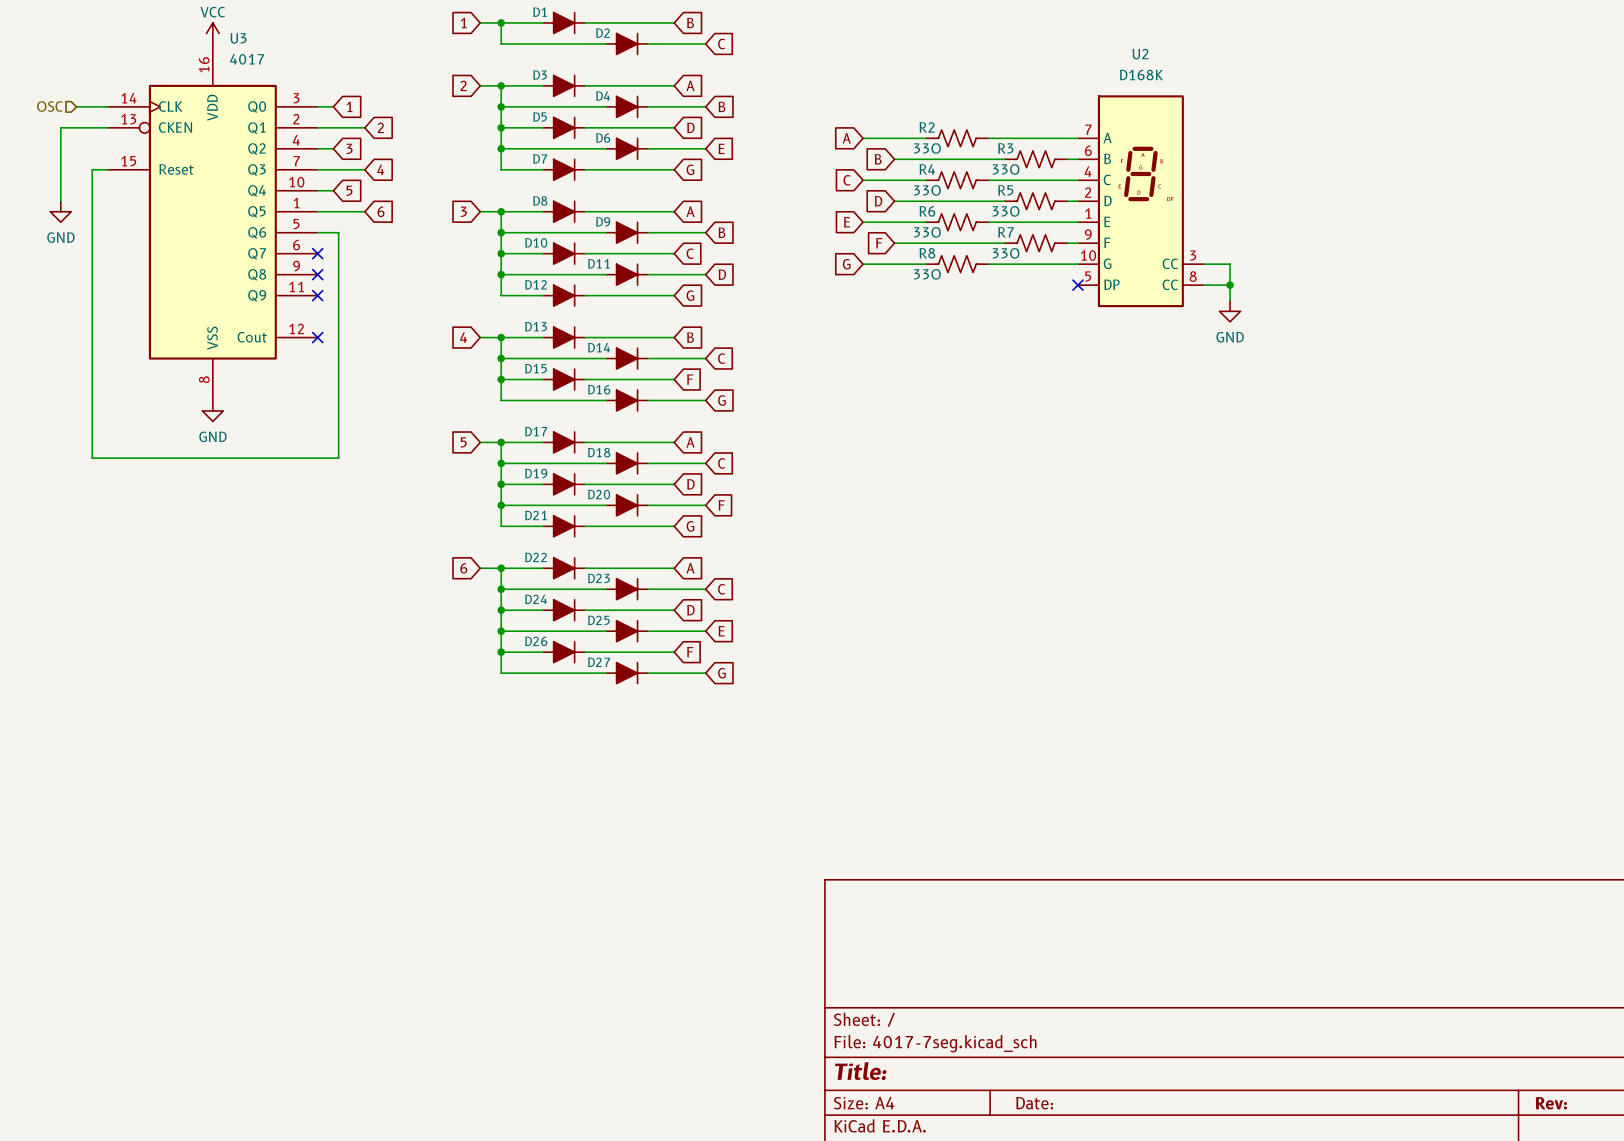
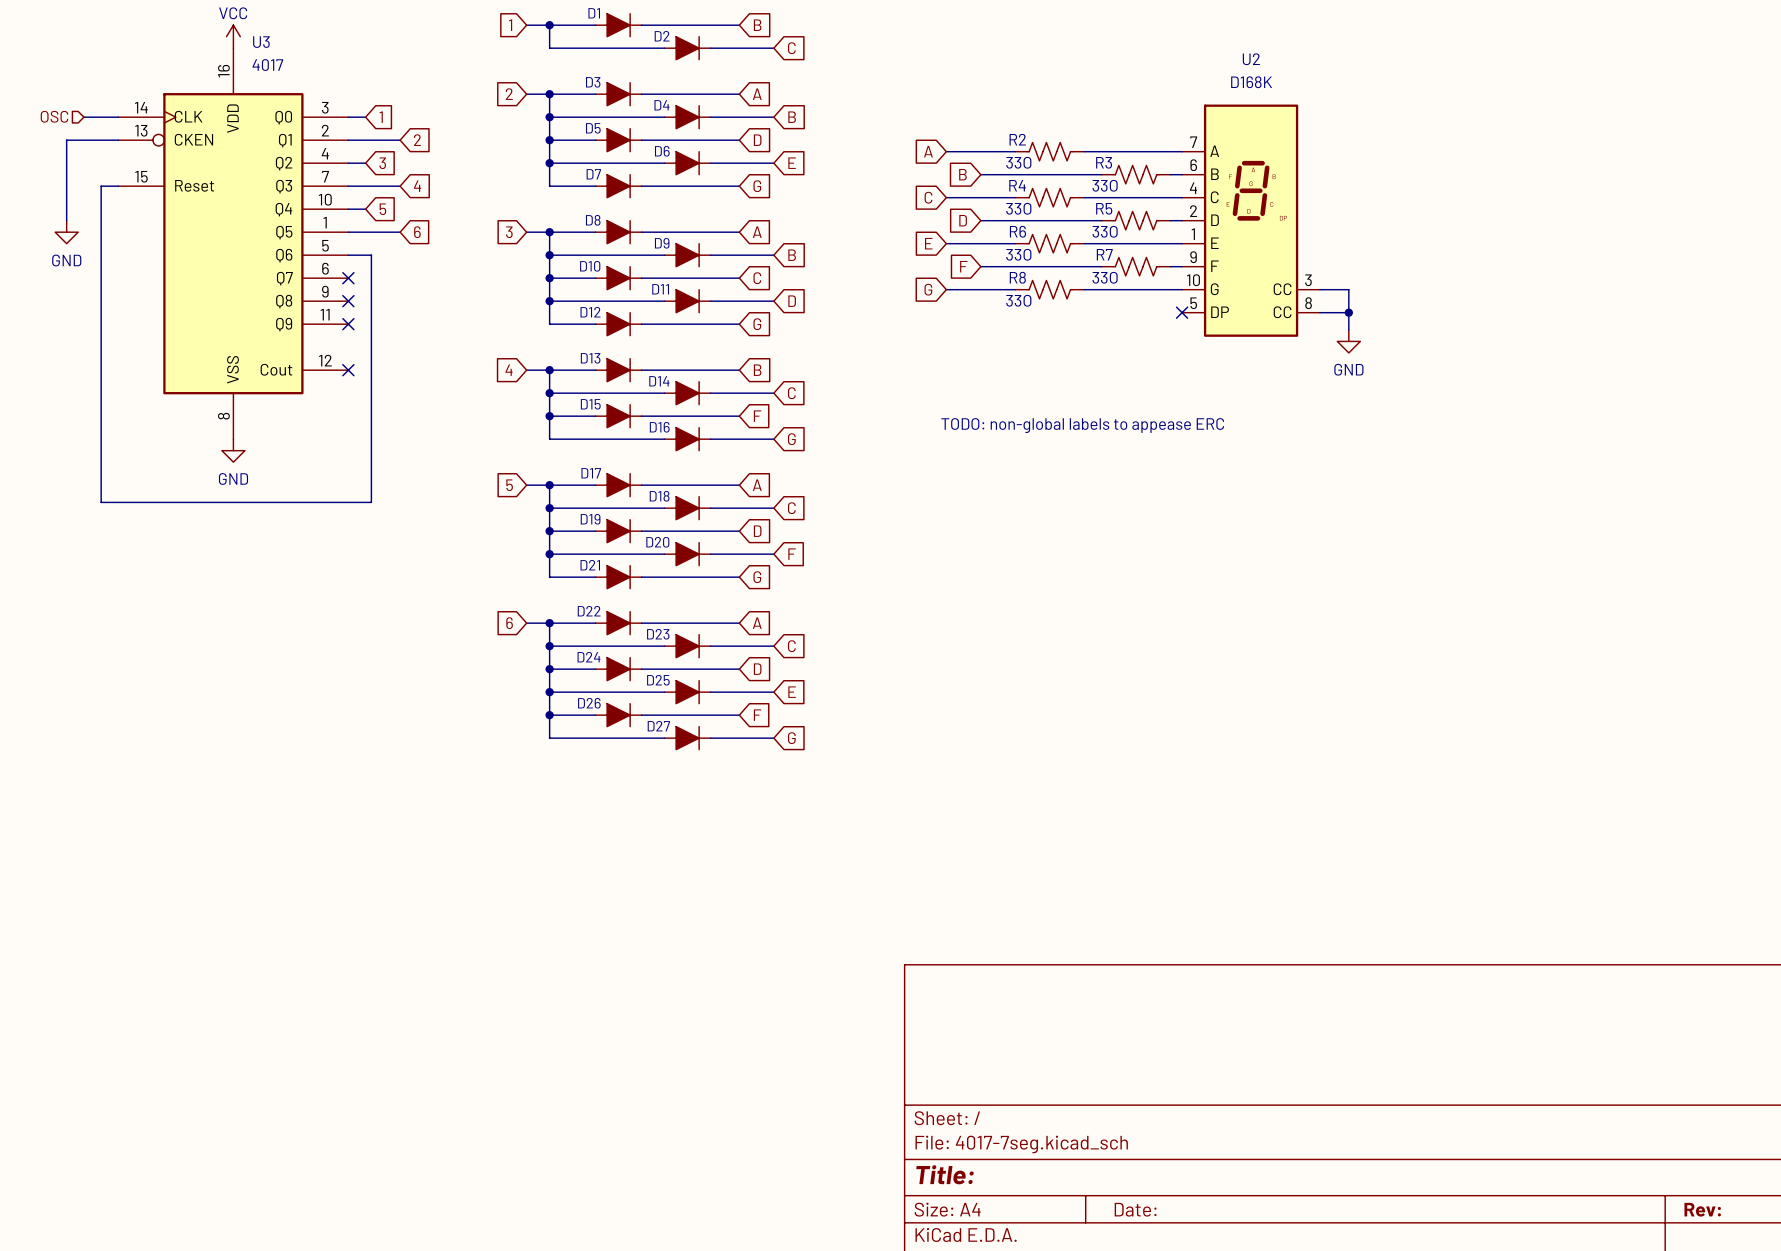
text: none -> TODO: non-global labels to appease ERC (1082, 425)

